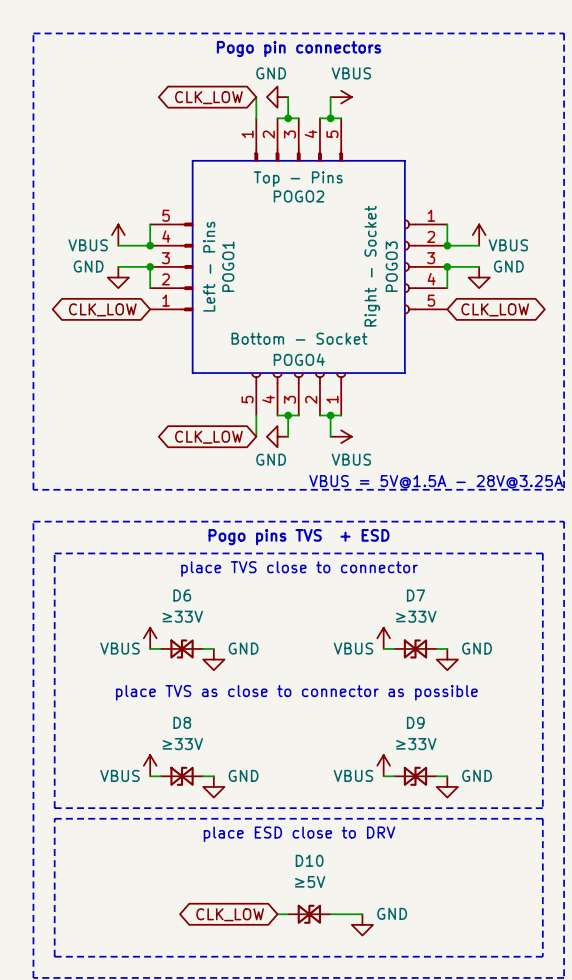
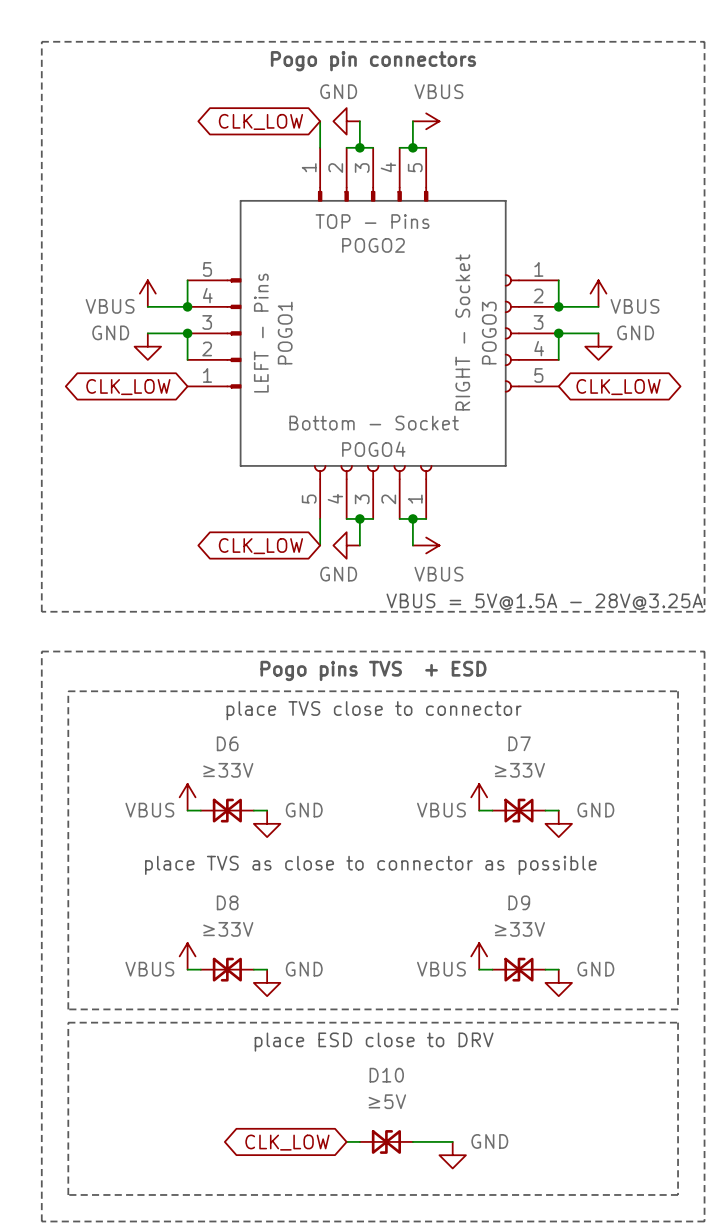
POGO2 value: Top - Pins (298, 179) -> TOP - Pins (372, 221)
POGO1 value: Left - Pins (209, 266) -> LEFT - Pins (261, 333)
POGO3 value: Right - Socket (372, 266) -> RIGHT - Socket (462, 332)

